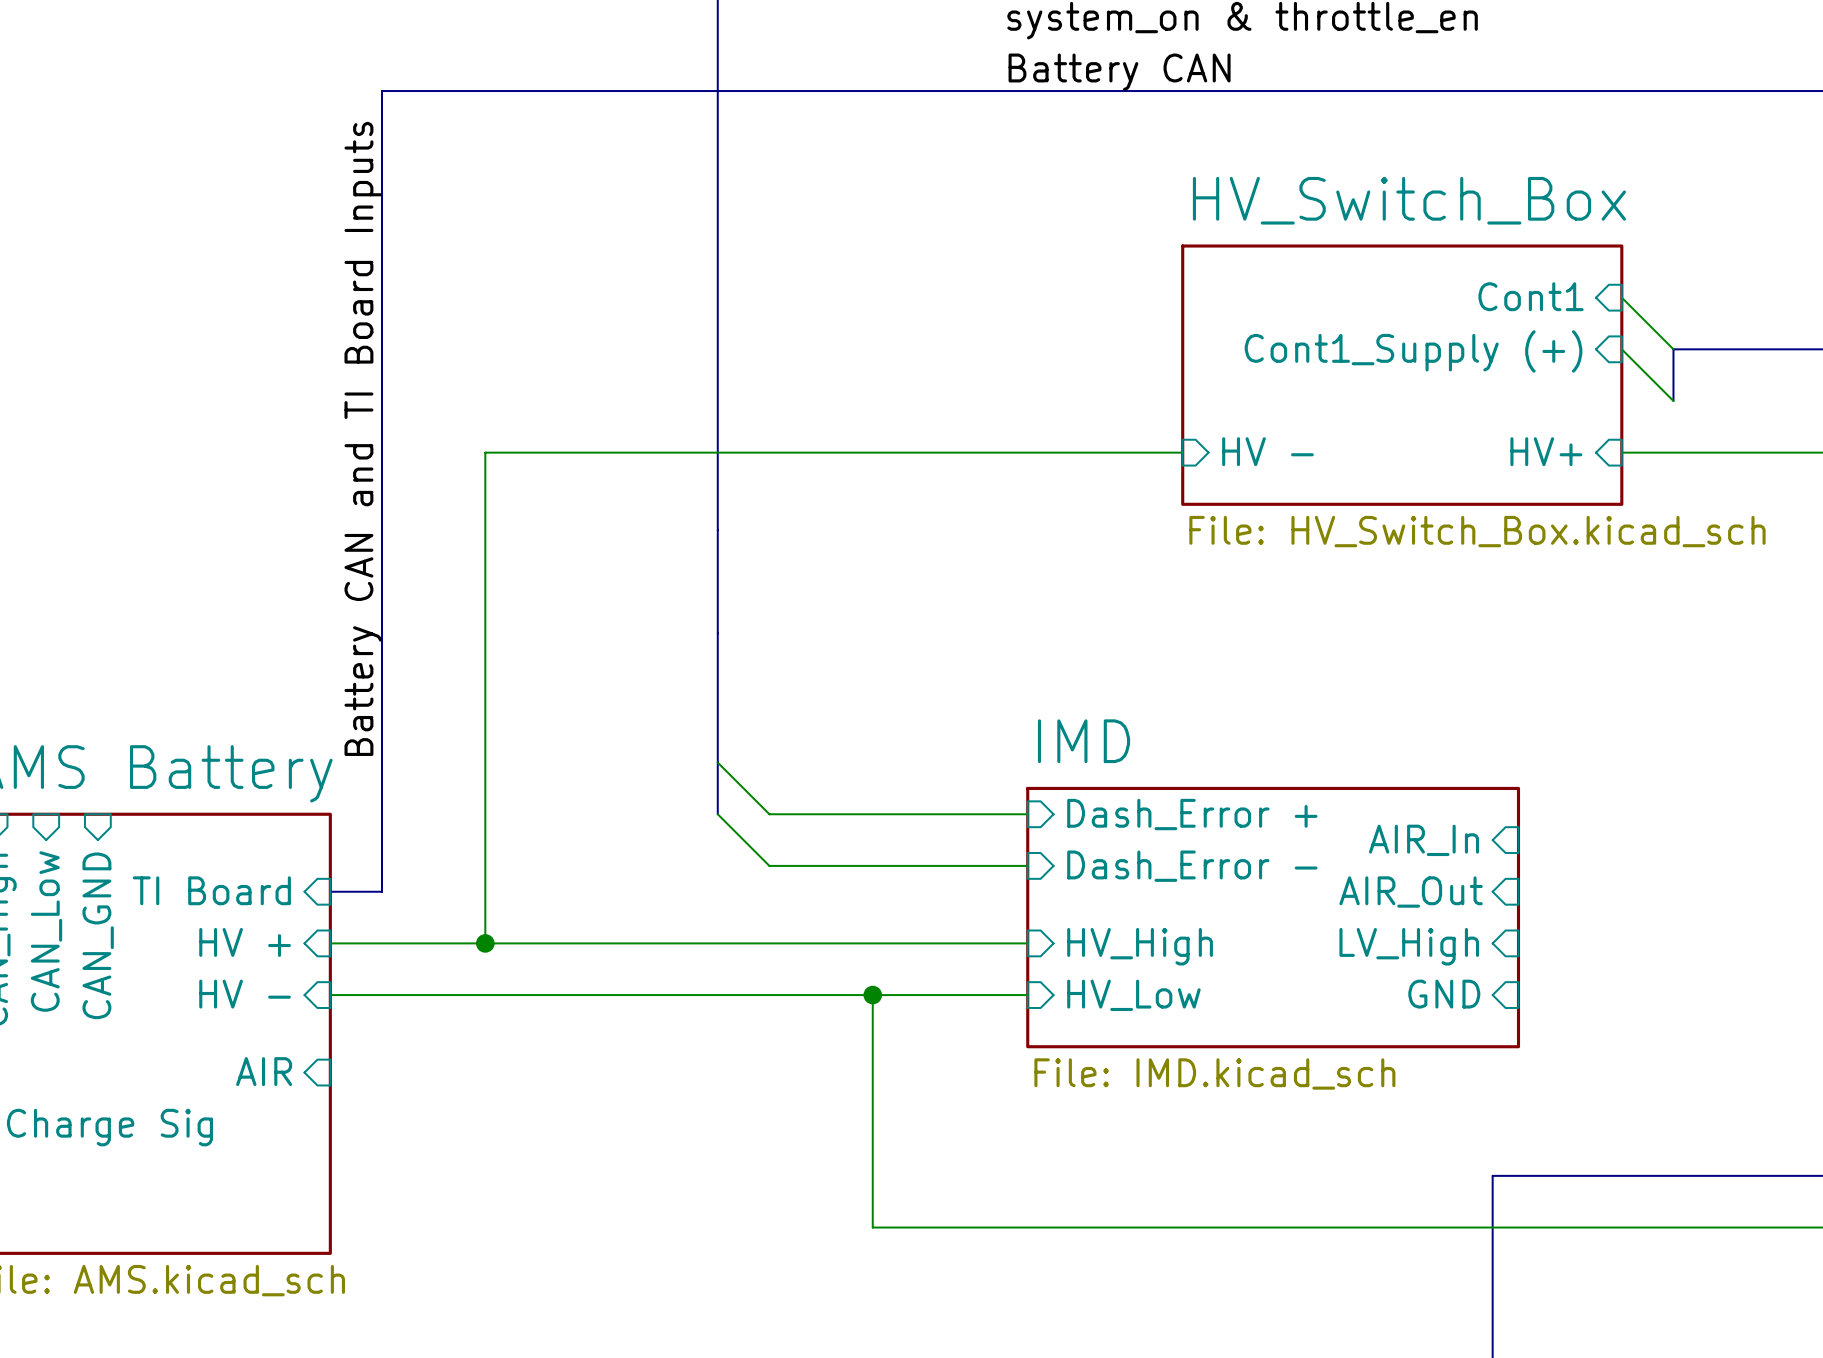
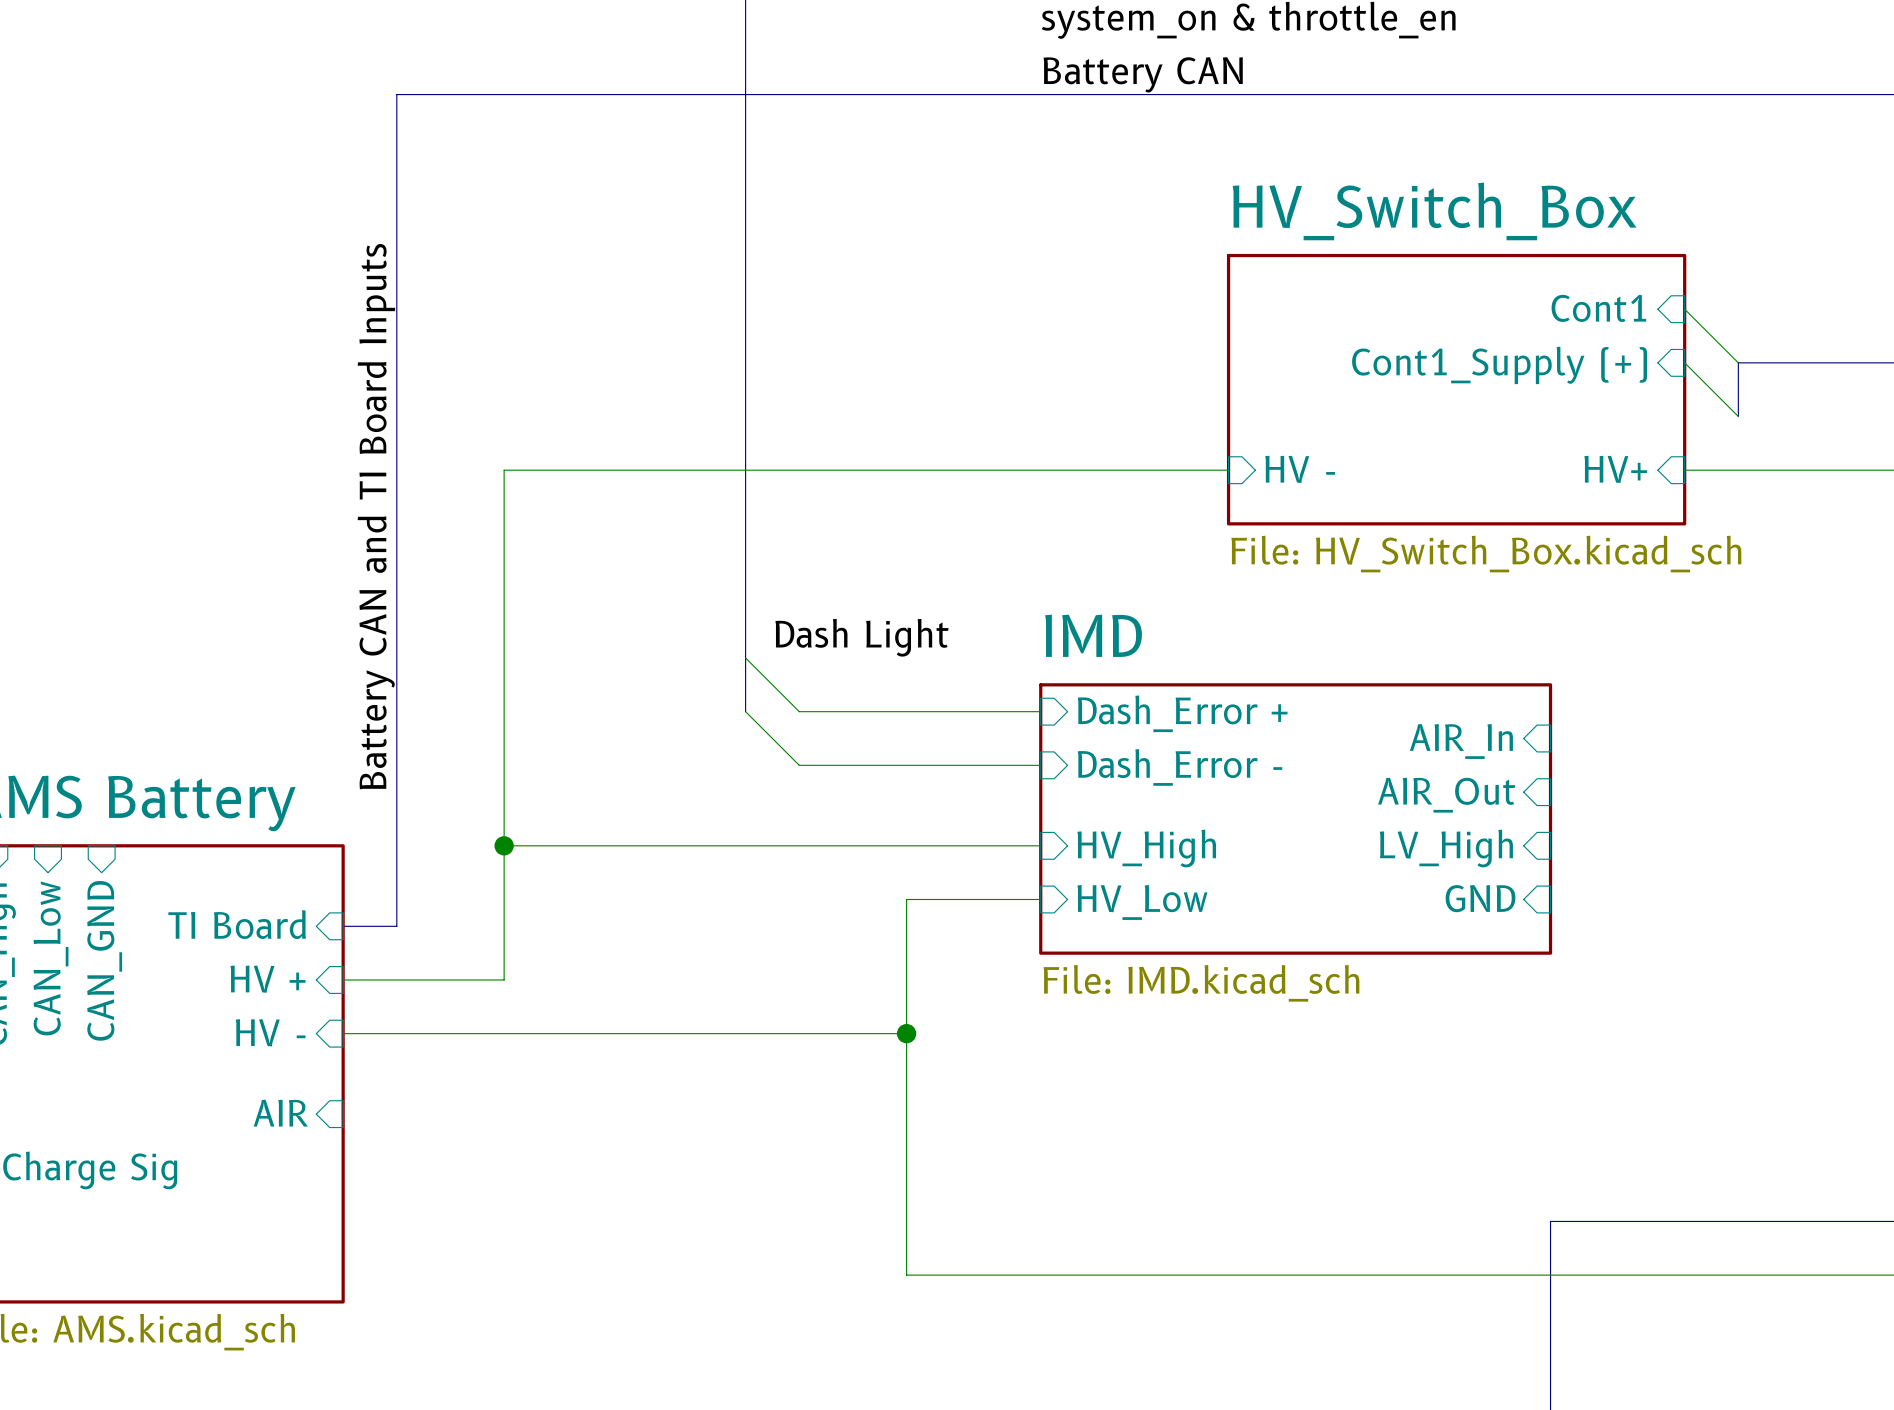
label: none -> Dash Light (861, 637)
wire: none -> (745, 658) (799, 711) (1040, 711)
wire: none -> (745, 711) (799, 765) (1040, 765)
bus: (717, 685) (717, 814) -> none
wire: (717, 762) (769, 814) -> (504, 845) (799, 845)
junction: none -> (504, 845)
wire: (717, 814) (769, 865) (872, 865) -> none
wire: (1001, 814) (1027, 814) -> none
sheet pin position: Dash_Error + (1192, 814) -> Dash_Error + (1182, 713)
sheet pin position: AIR_In (1424, 840) -> AIR_In (1461, 741)
wire: (1001, 865) (1027, 865) -> none
sheet pin position: Dash_Error - (1192, 866) -> Dash_Error - (1180, 767)
sheet pin position: AIR_Out (1411, 892) -> AIR_Out (1446, 795)
sheet IMD position: (1273, 917) -> (1295, 818)
wire: (485, 943) (1027, 943) -> none
junction: (485, 943) -> none
sheet pin position: HV_High (1140, 946) -> HV_High (1146, 848)
sheet pin position: LV_High (1409, 946) -> LV_High (1446, 848)
sheet pin position: GND (1444, 994) -> GND (1480, 898)
wire: (872, 995) (1027, 995) -> (906, 1033) (906, 899)
sheet pin position: HV_Low (1133, 995) -> HV_Low (1142, 902)

